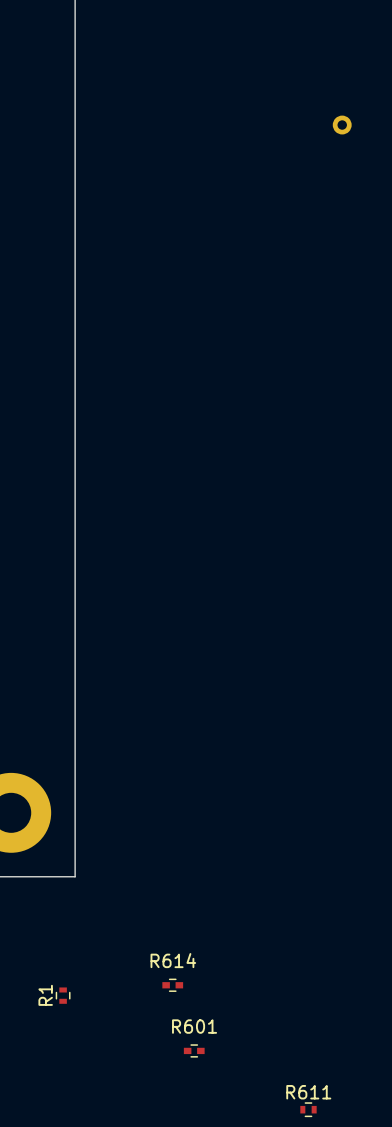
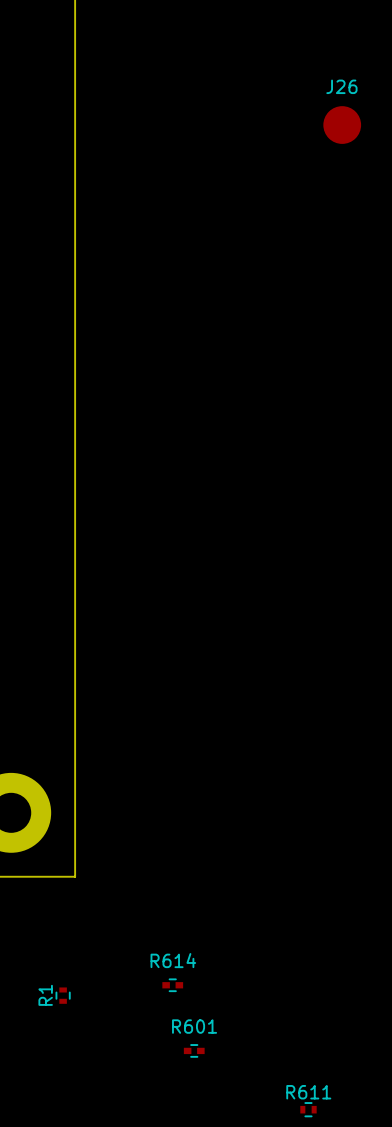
part: (342, 125) -> none
J26: none -> (342, 125)

